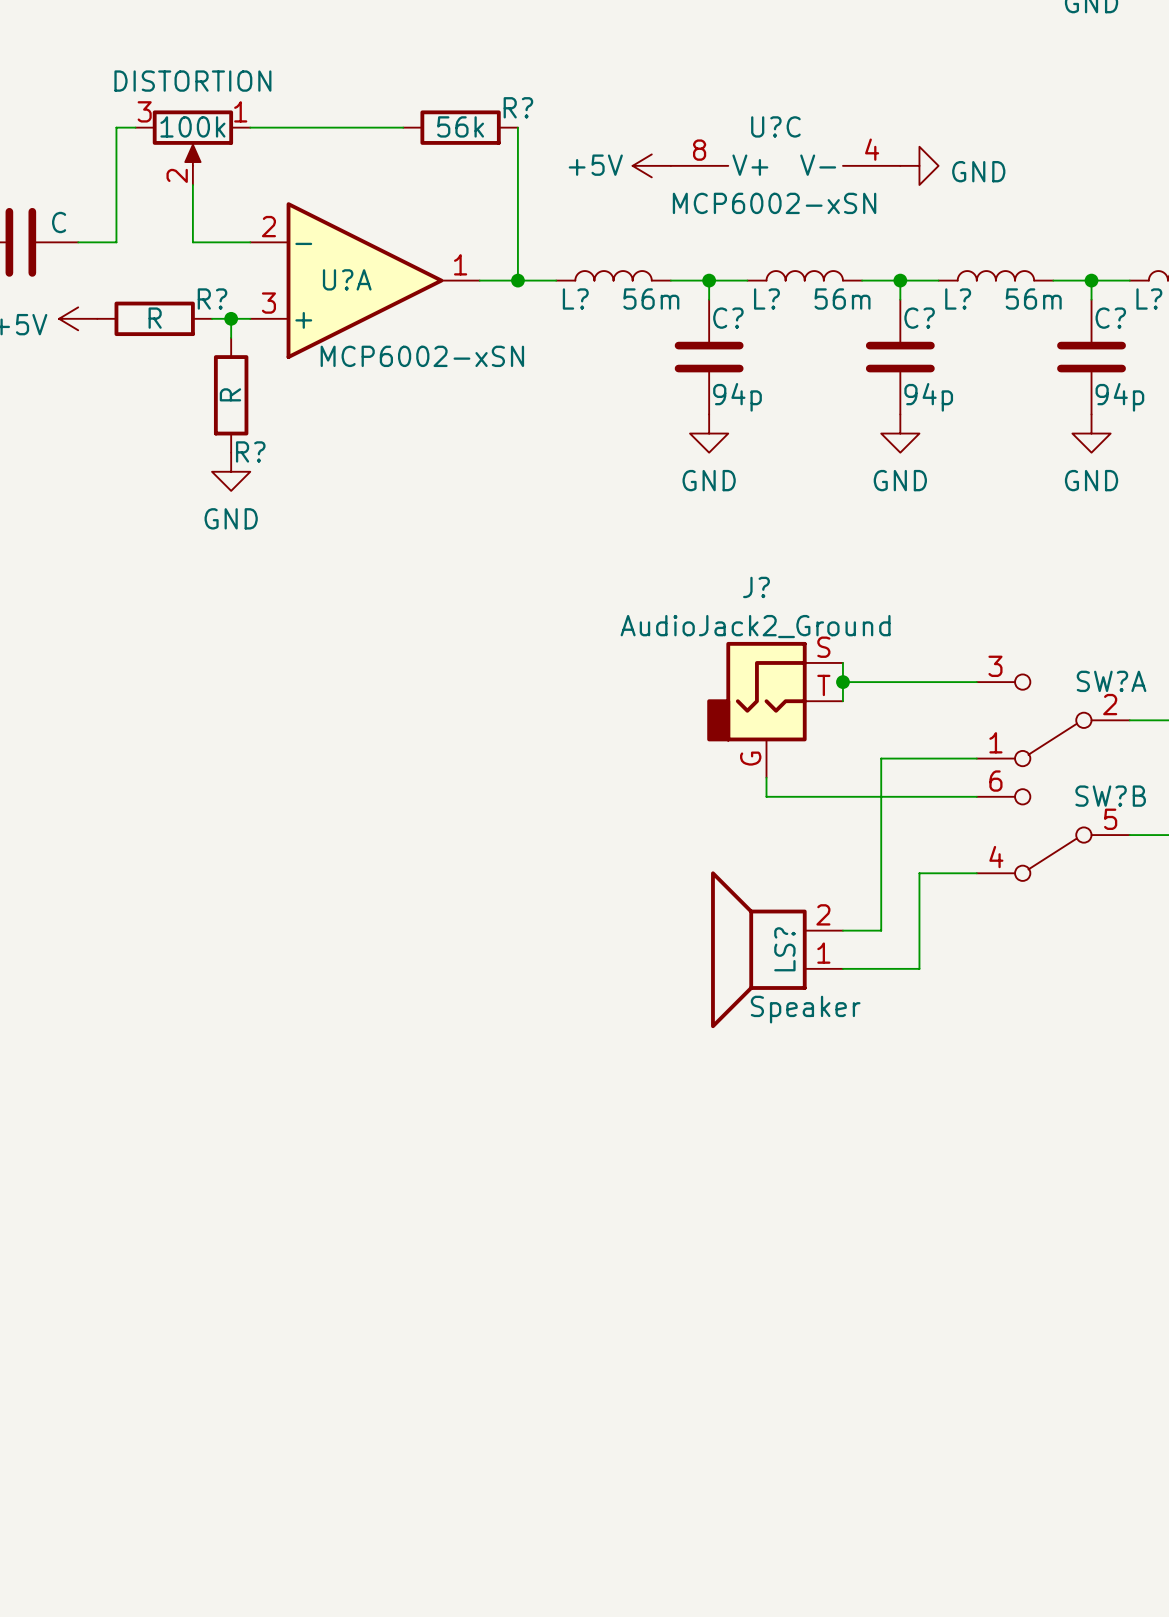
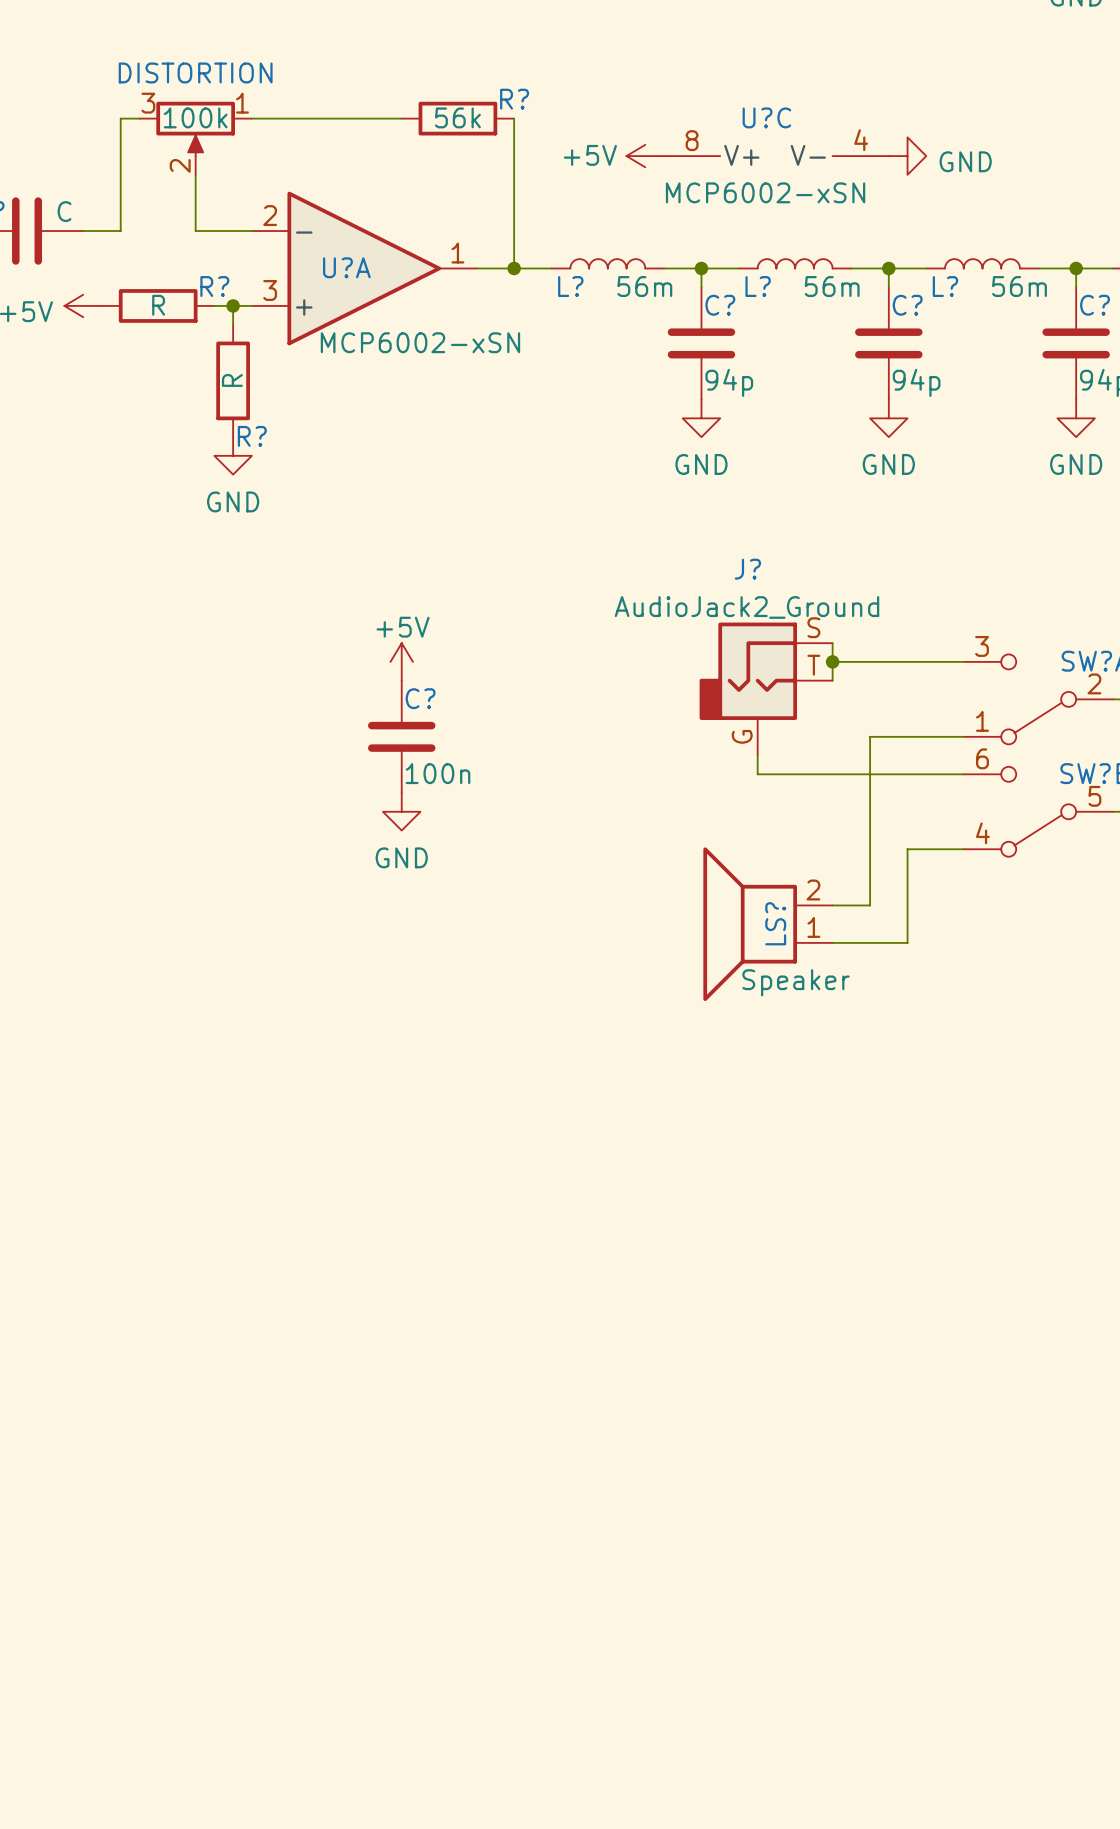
power symbol: none -> +5V (401, 661)
C?: none -> 100n (401, 736)
power symbol: none -> GND (401, 811)

